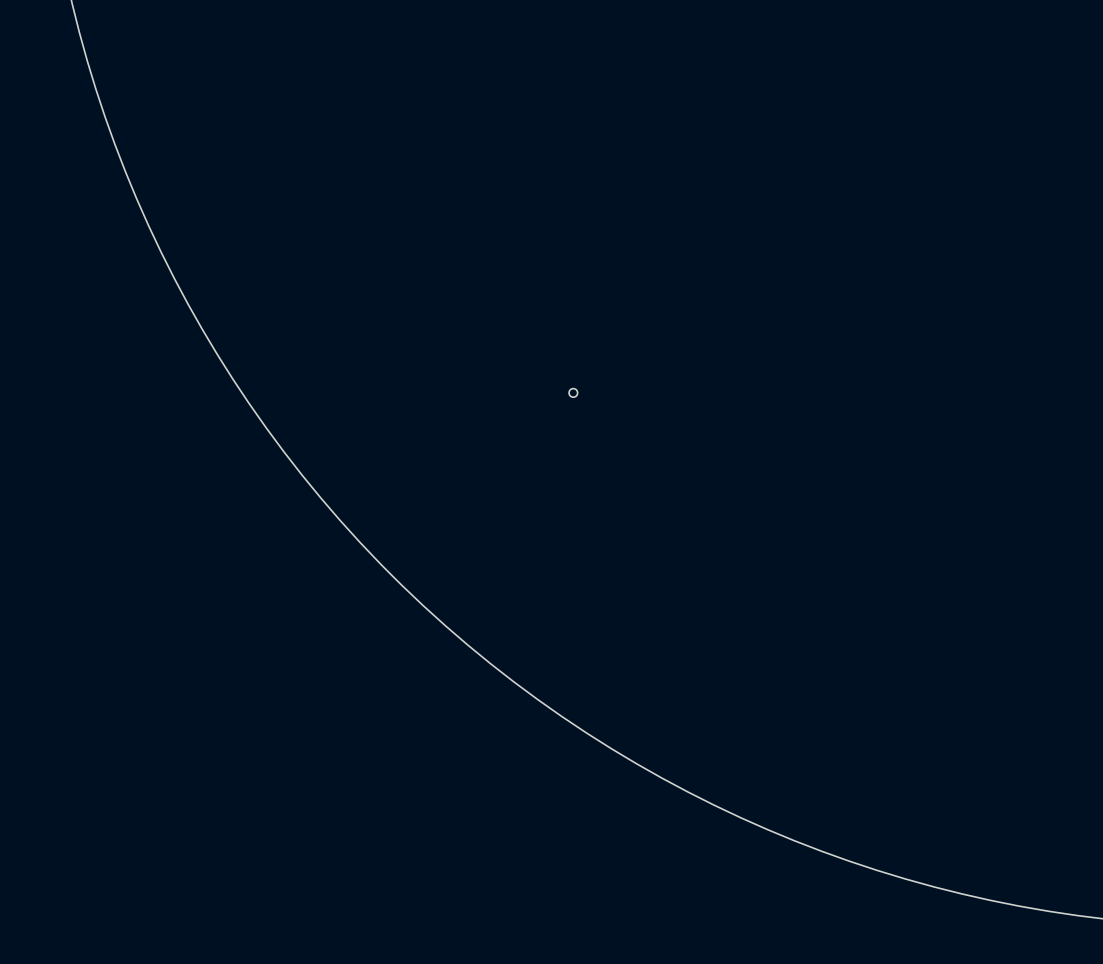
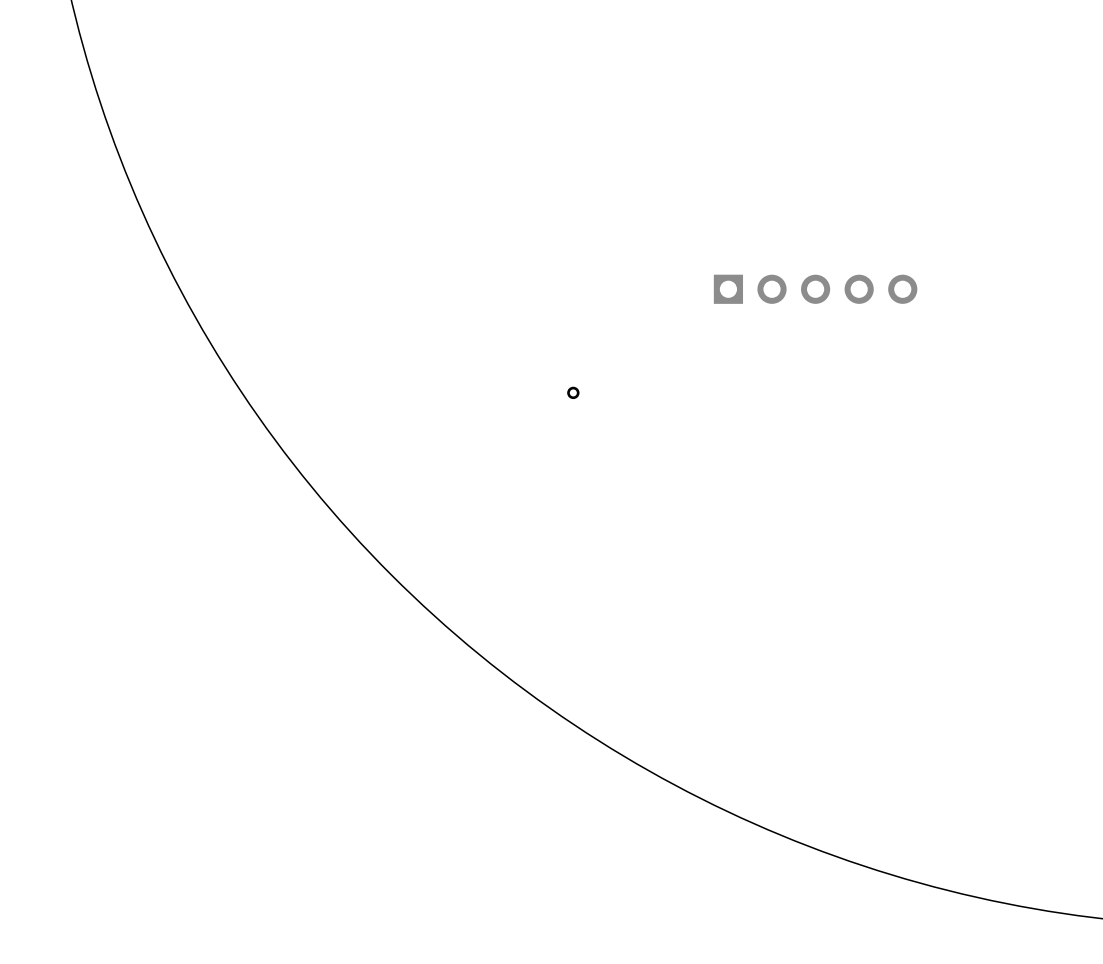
part: none -> (815, 289)
part footprint: [569, 388, 578, 398] -> [567, 386, 580, 400]

